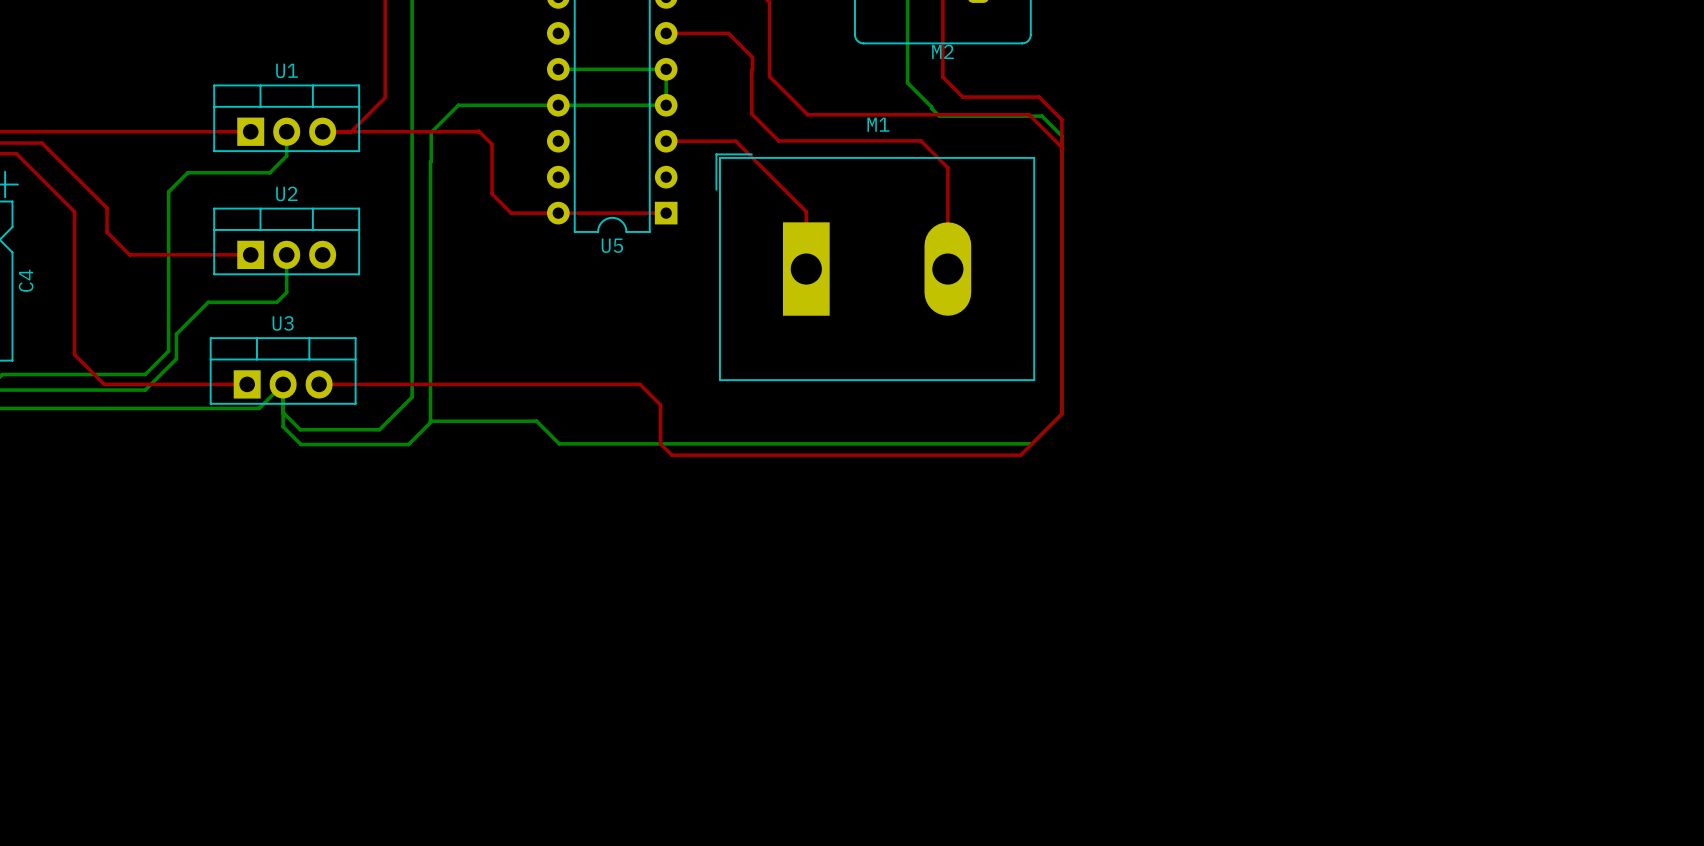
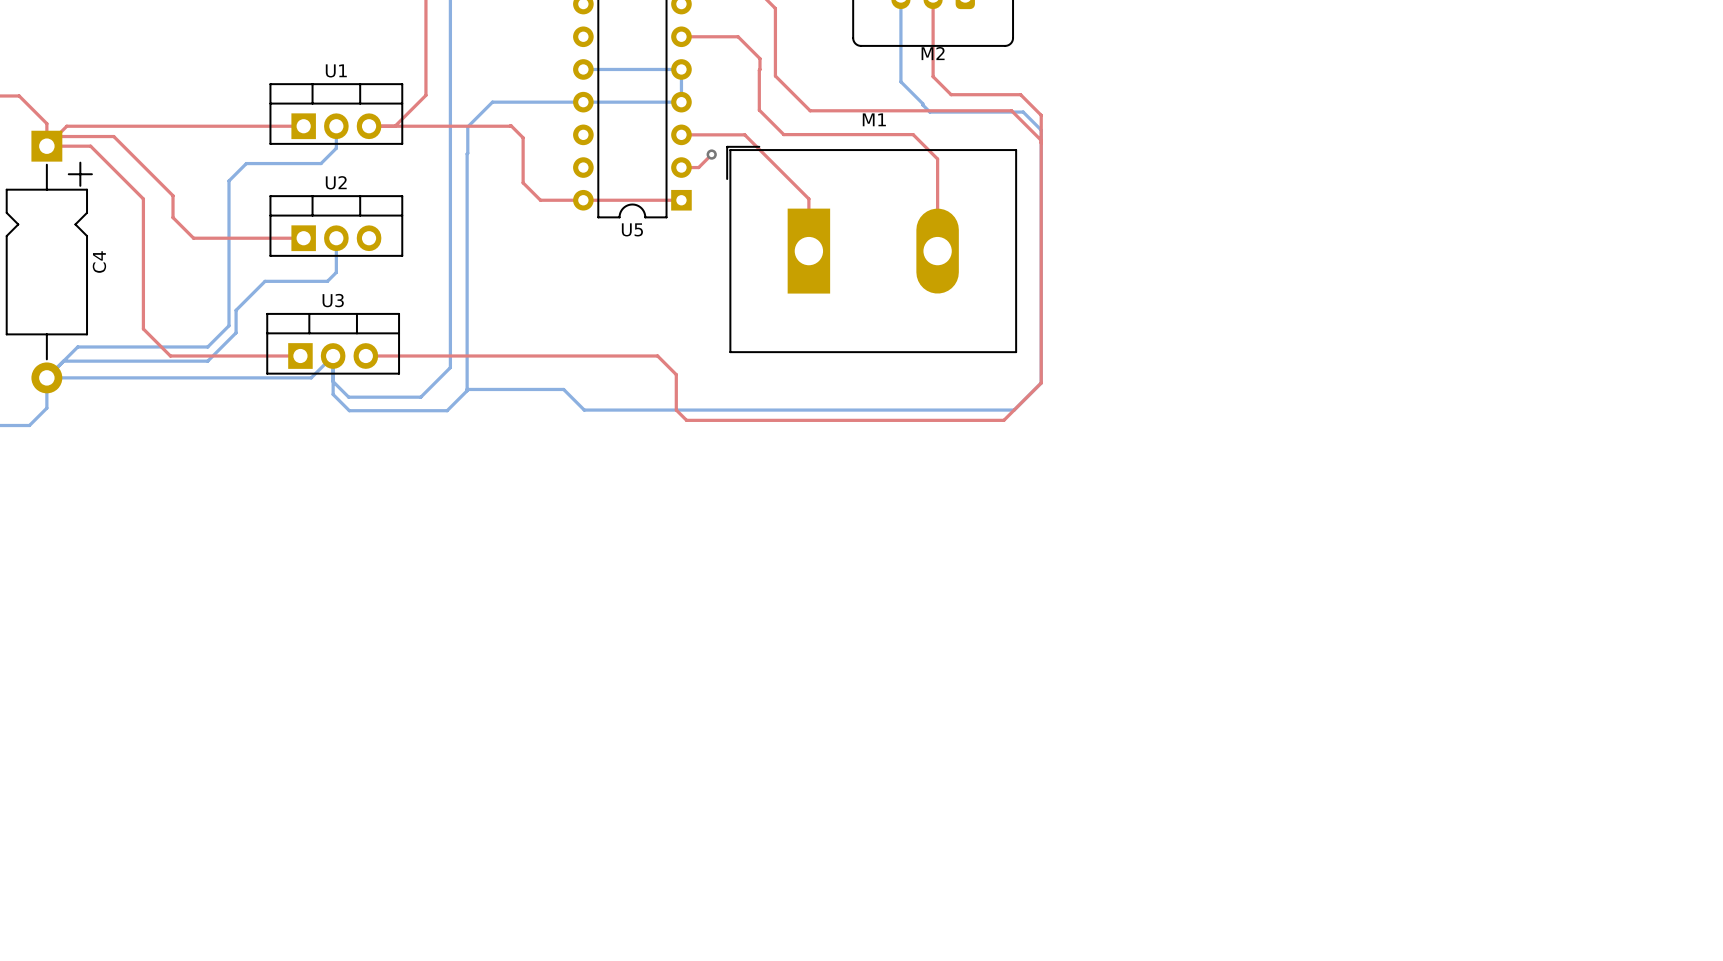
top track: none -> (711, 154) (698, 167) (681, 167)
via: none -> (711, 154)

